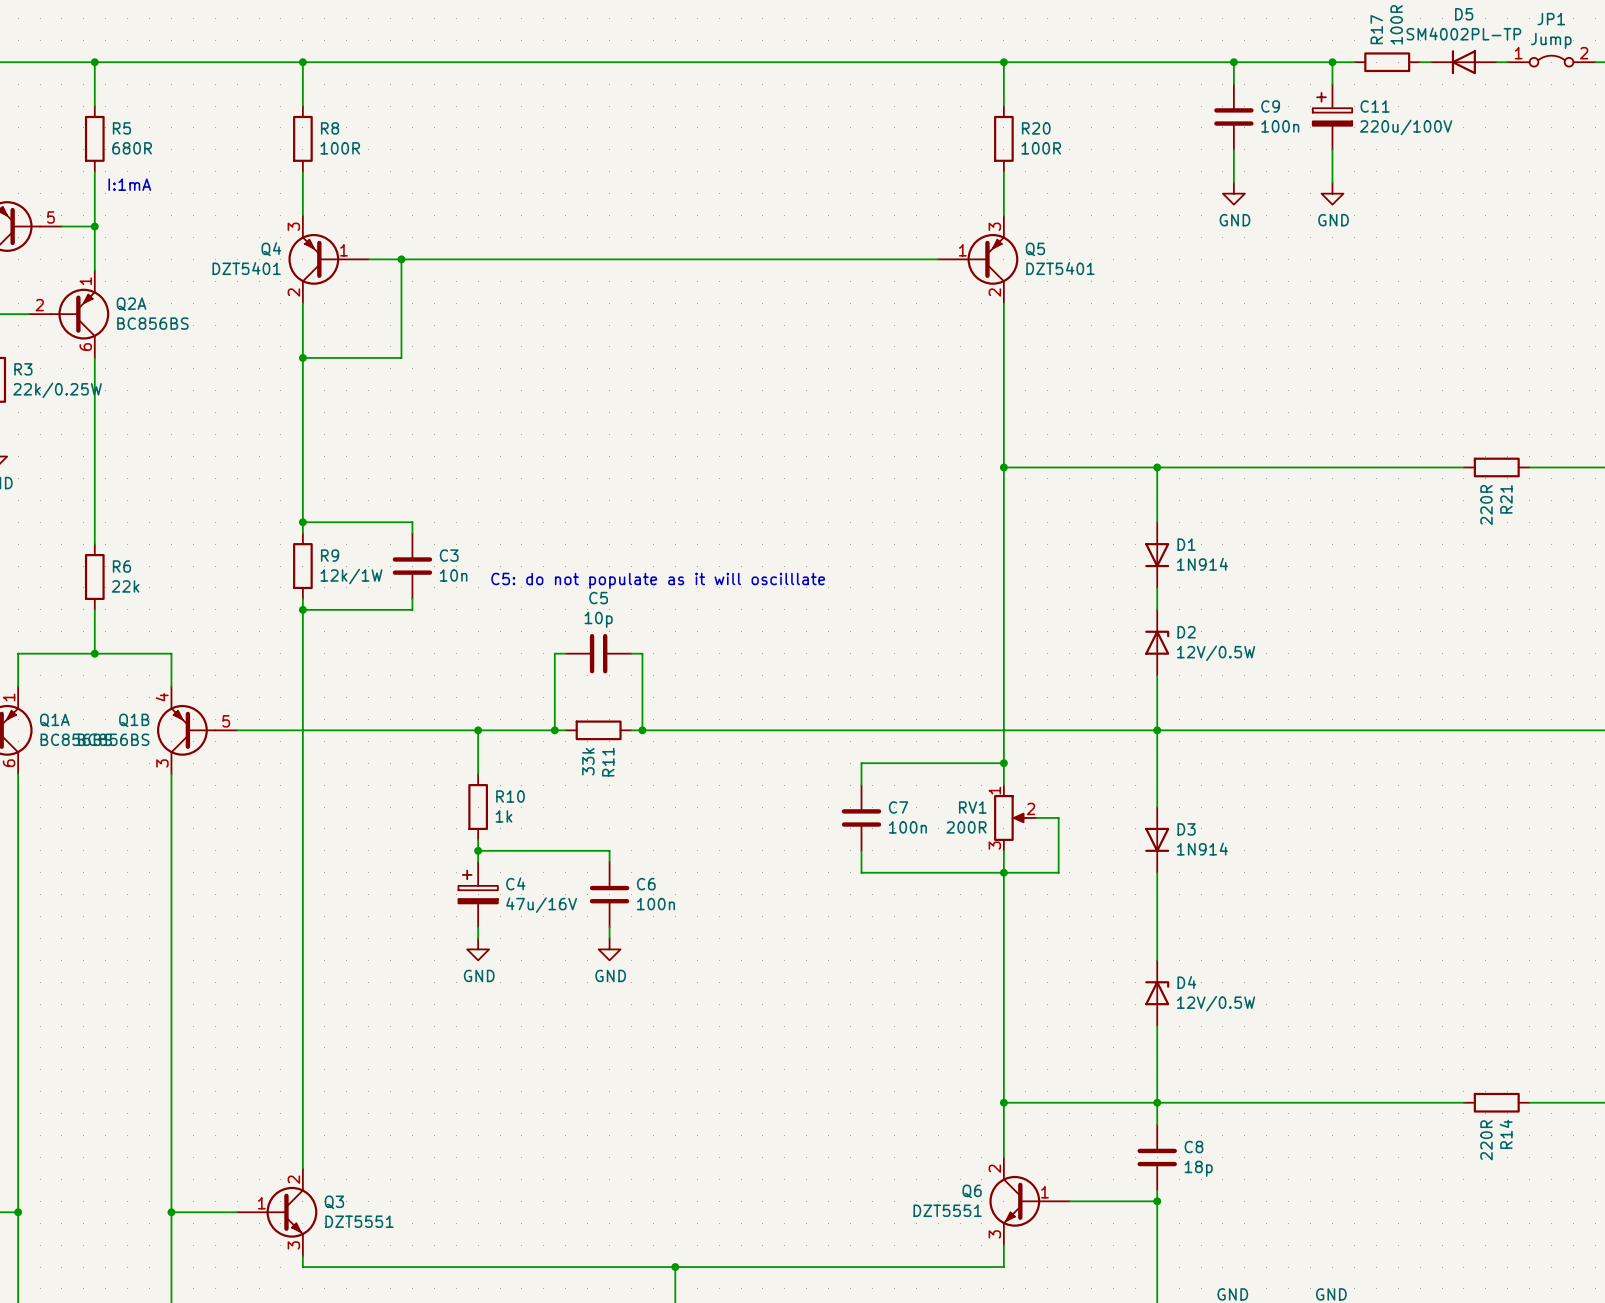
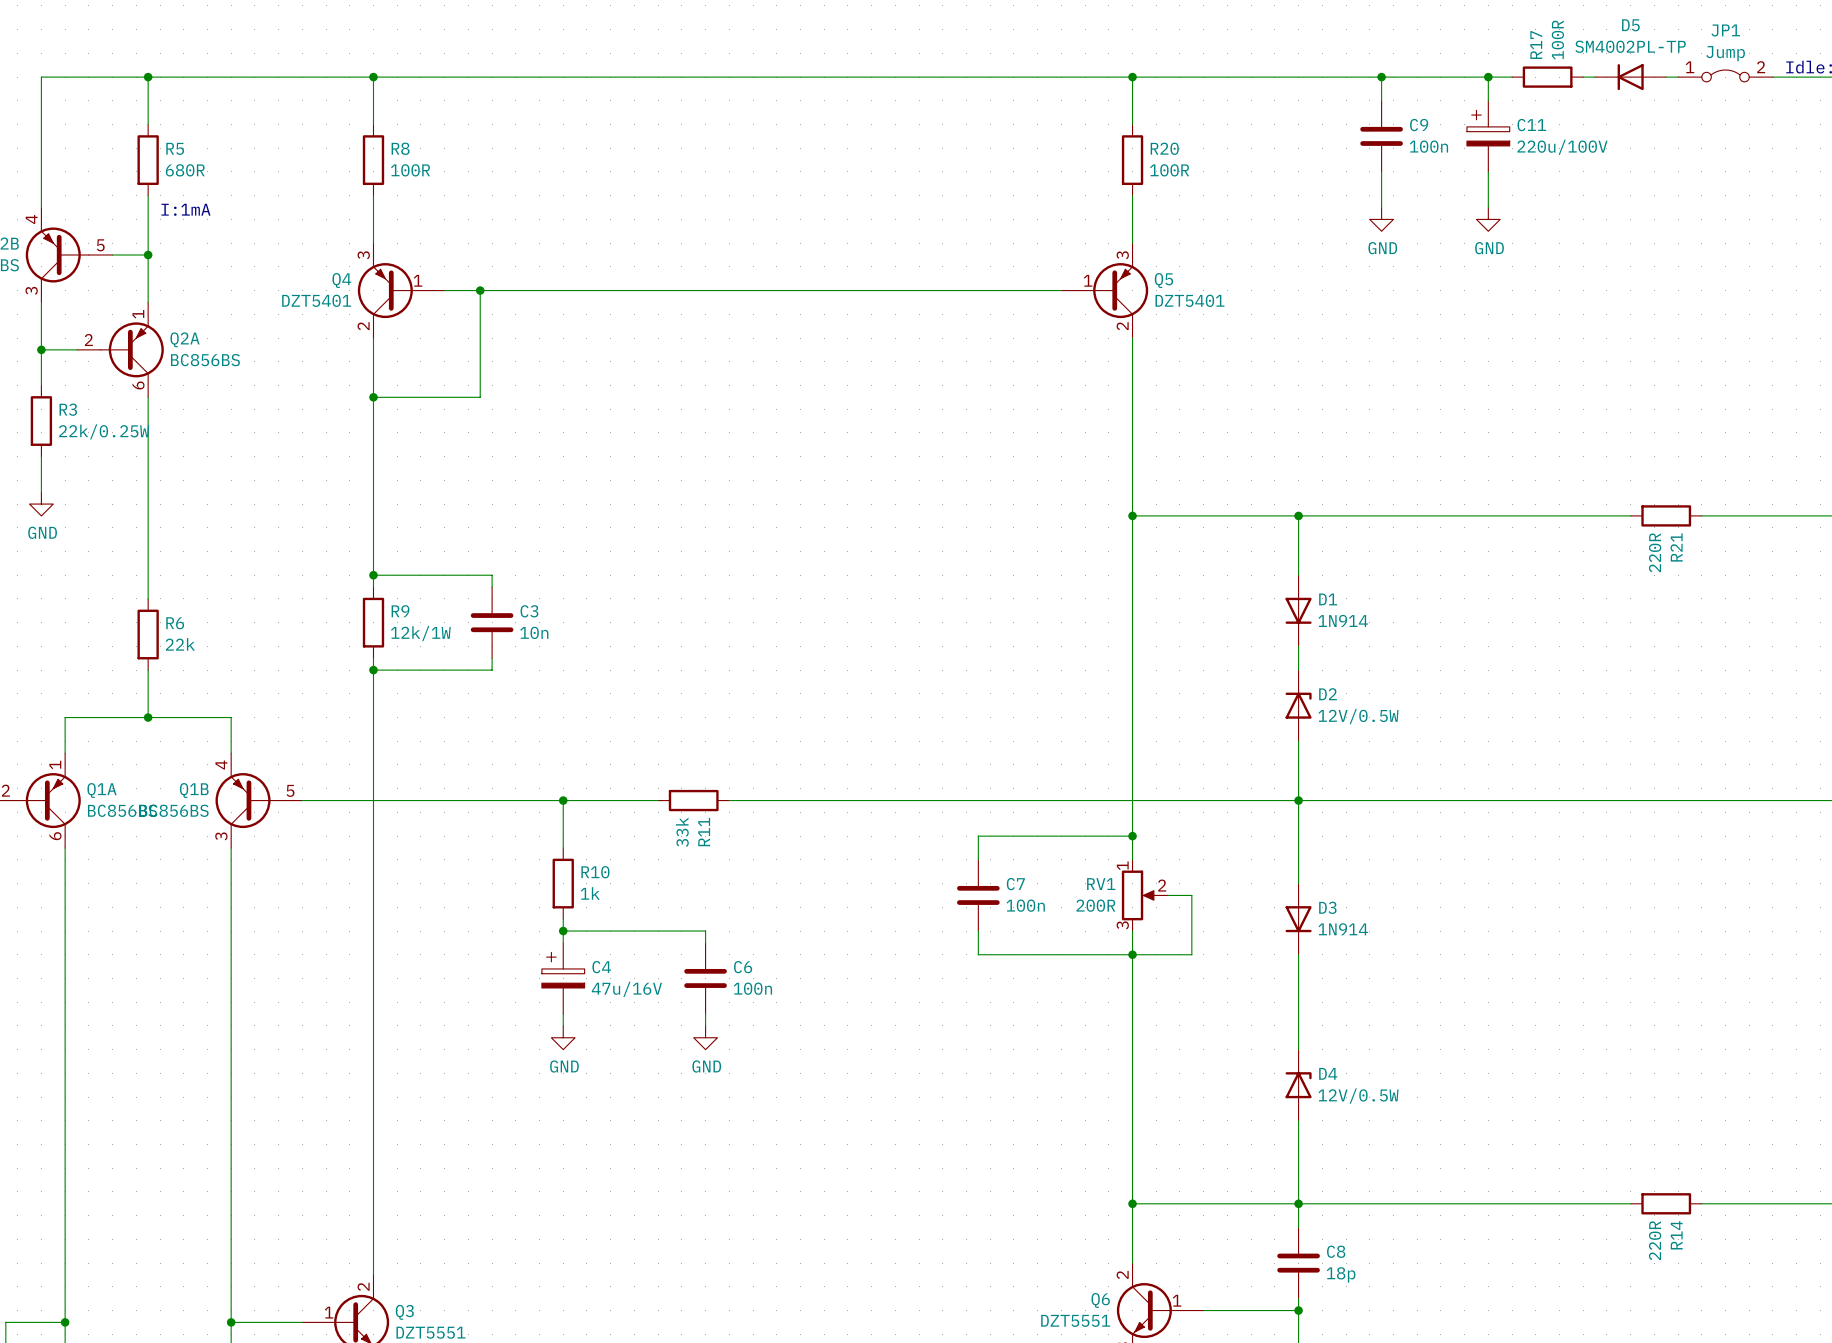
text: C5: do not populate as it will oscilllate (658, 580) -> none
wire: (565, 653) (554, 653) (554, 730) -> none
C5: 10p (598, 653) -> none
wire: (631, 653) (642, 653) (642, 730) -> none
junction: (554, 730) -> none
junction: (642, 730) -> none

